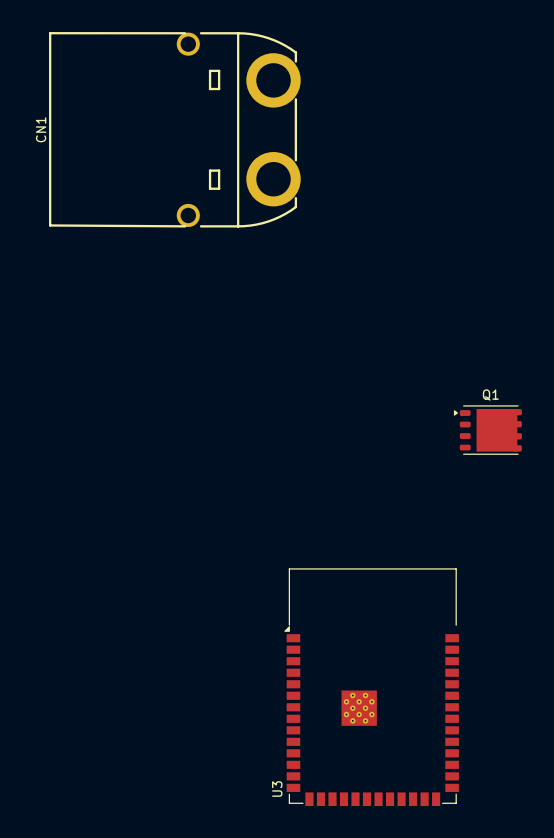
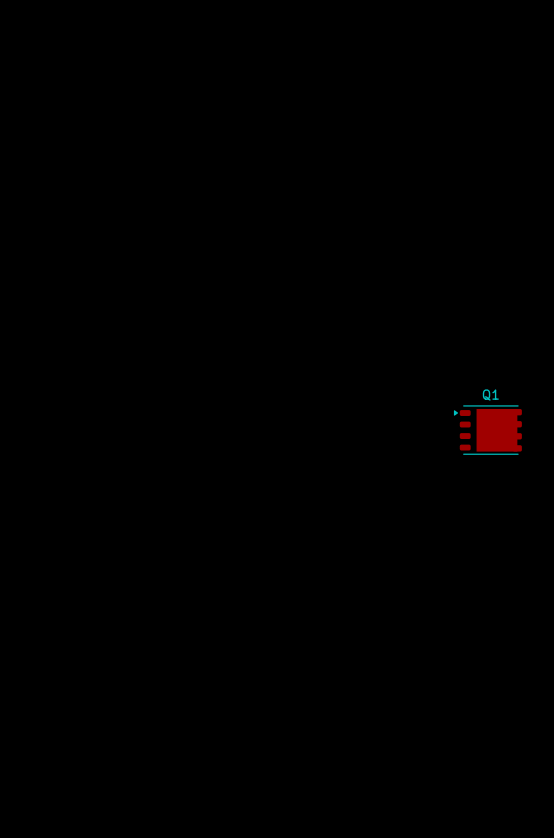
CN1: (174, 129) -> none
U3: (371, 687) -> none

